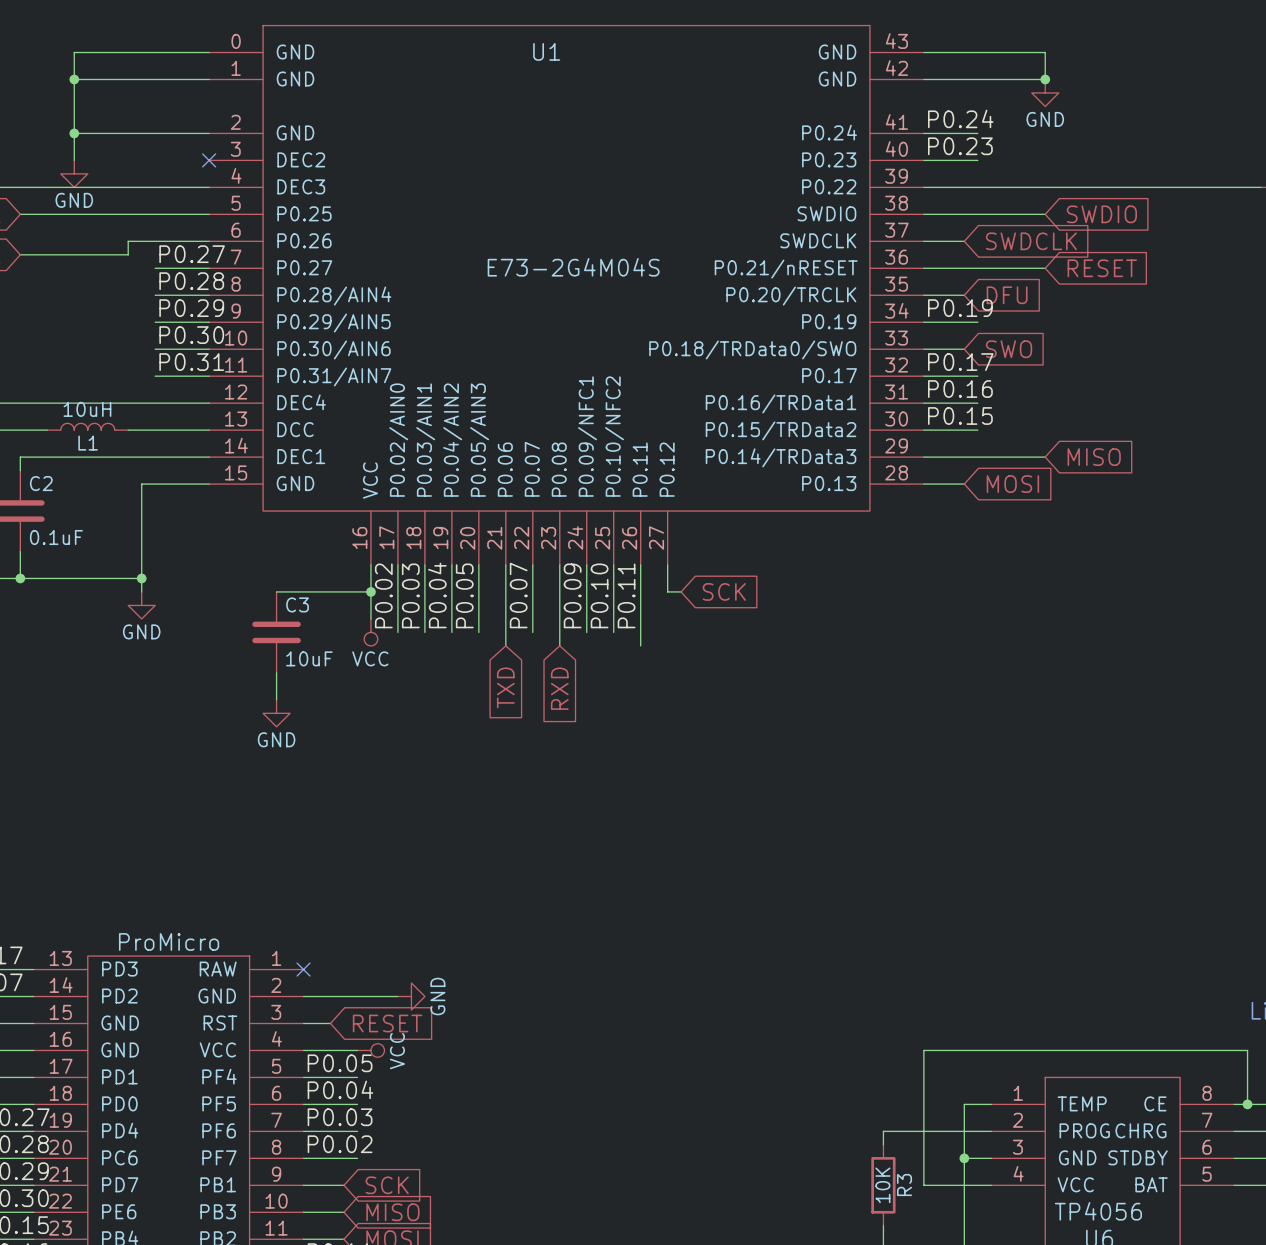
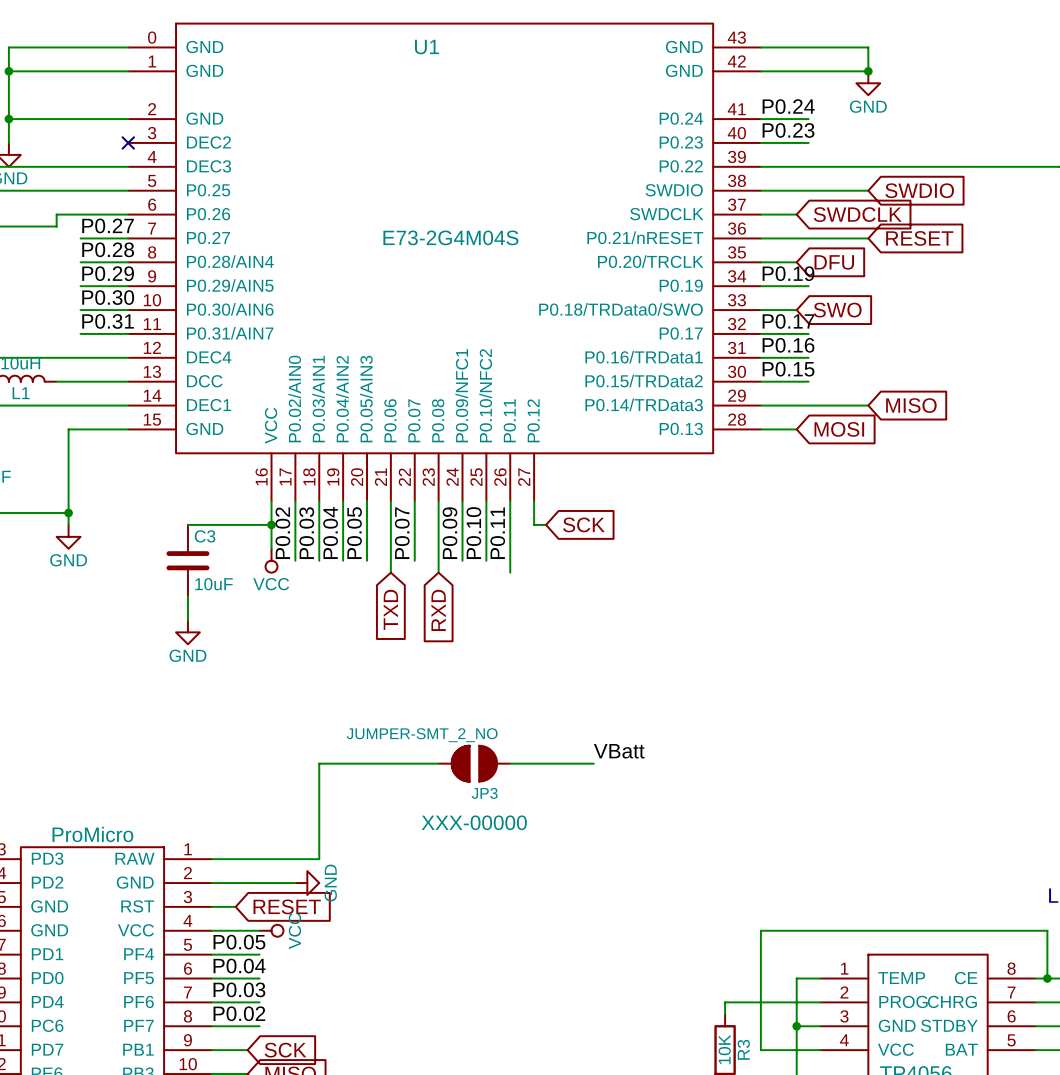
label: none -> VBatt (619, 751)
wire: none -> (438, 763) (319, 763) (319, 859) (211, 859)
JP3: none -> JUMPER-SMT_2_NO (474, 763)
wire: none -> (510, 763) (593, 763)
no-connect mark: (303, 969) -> none

